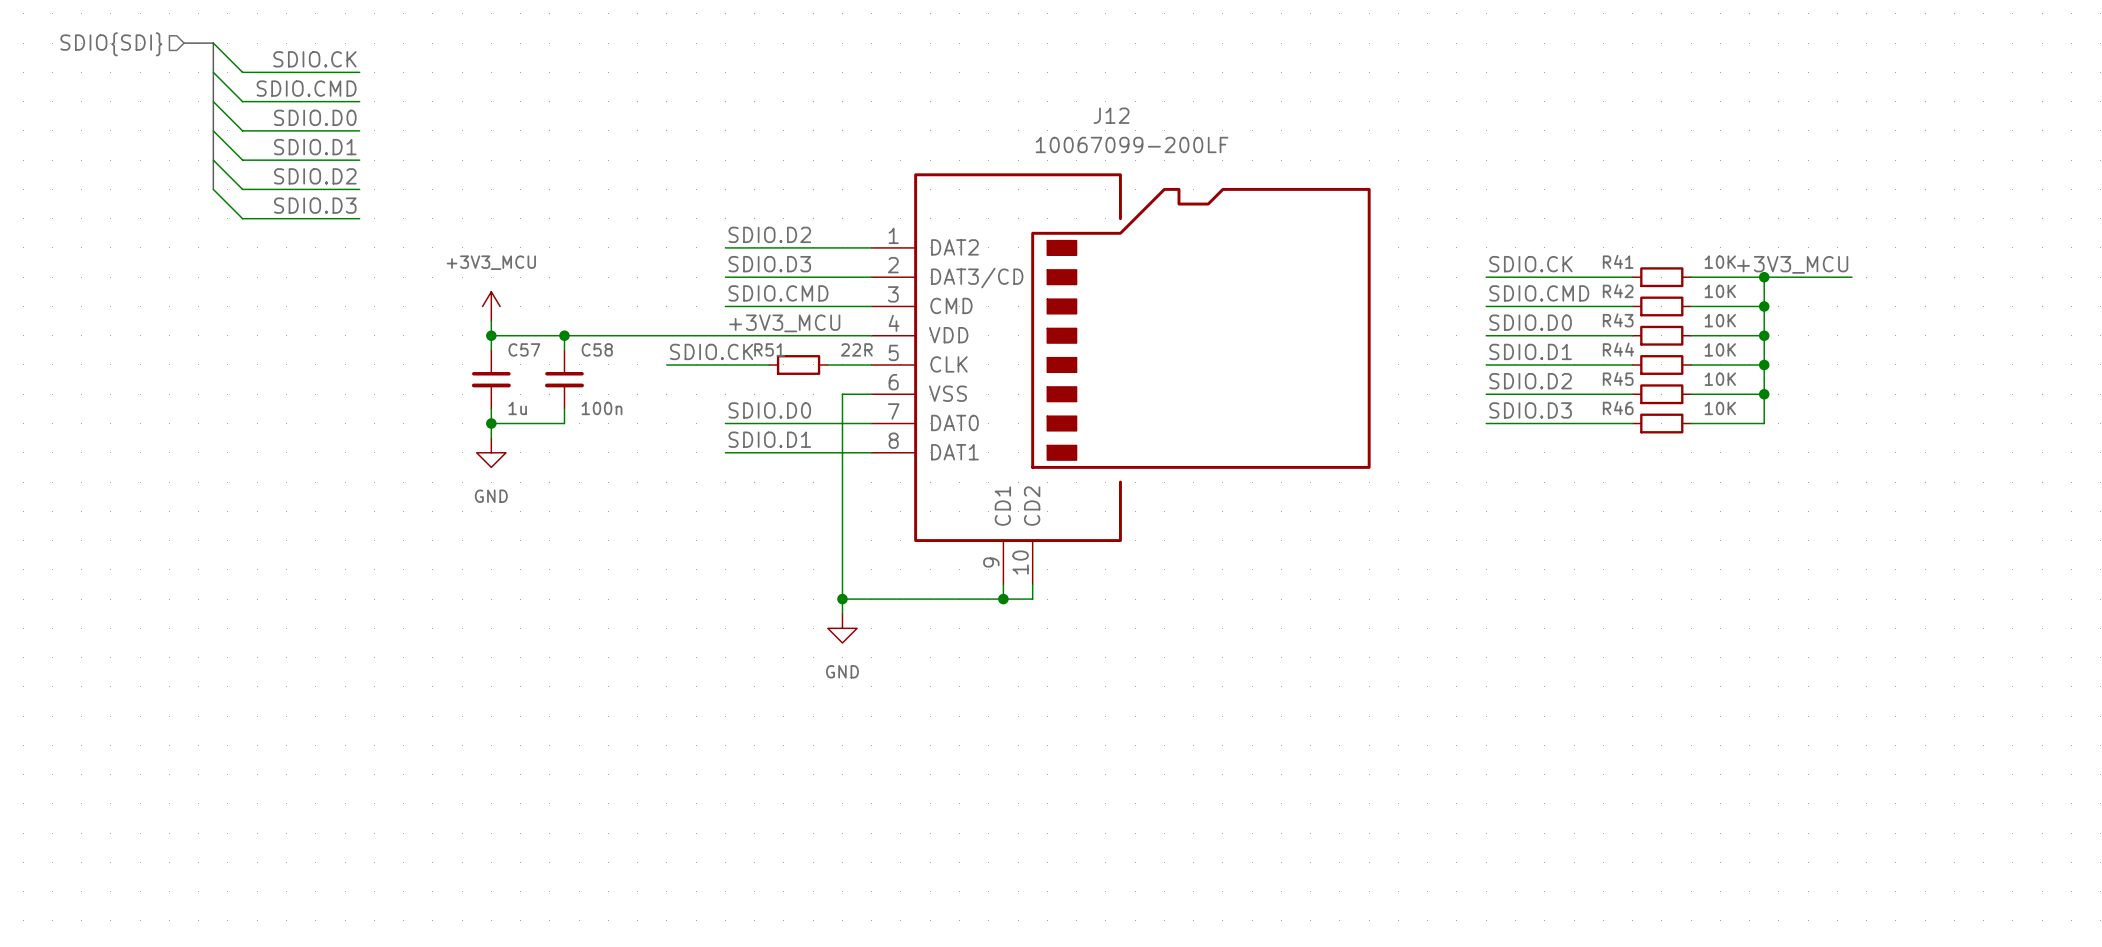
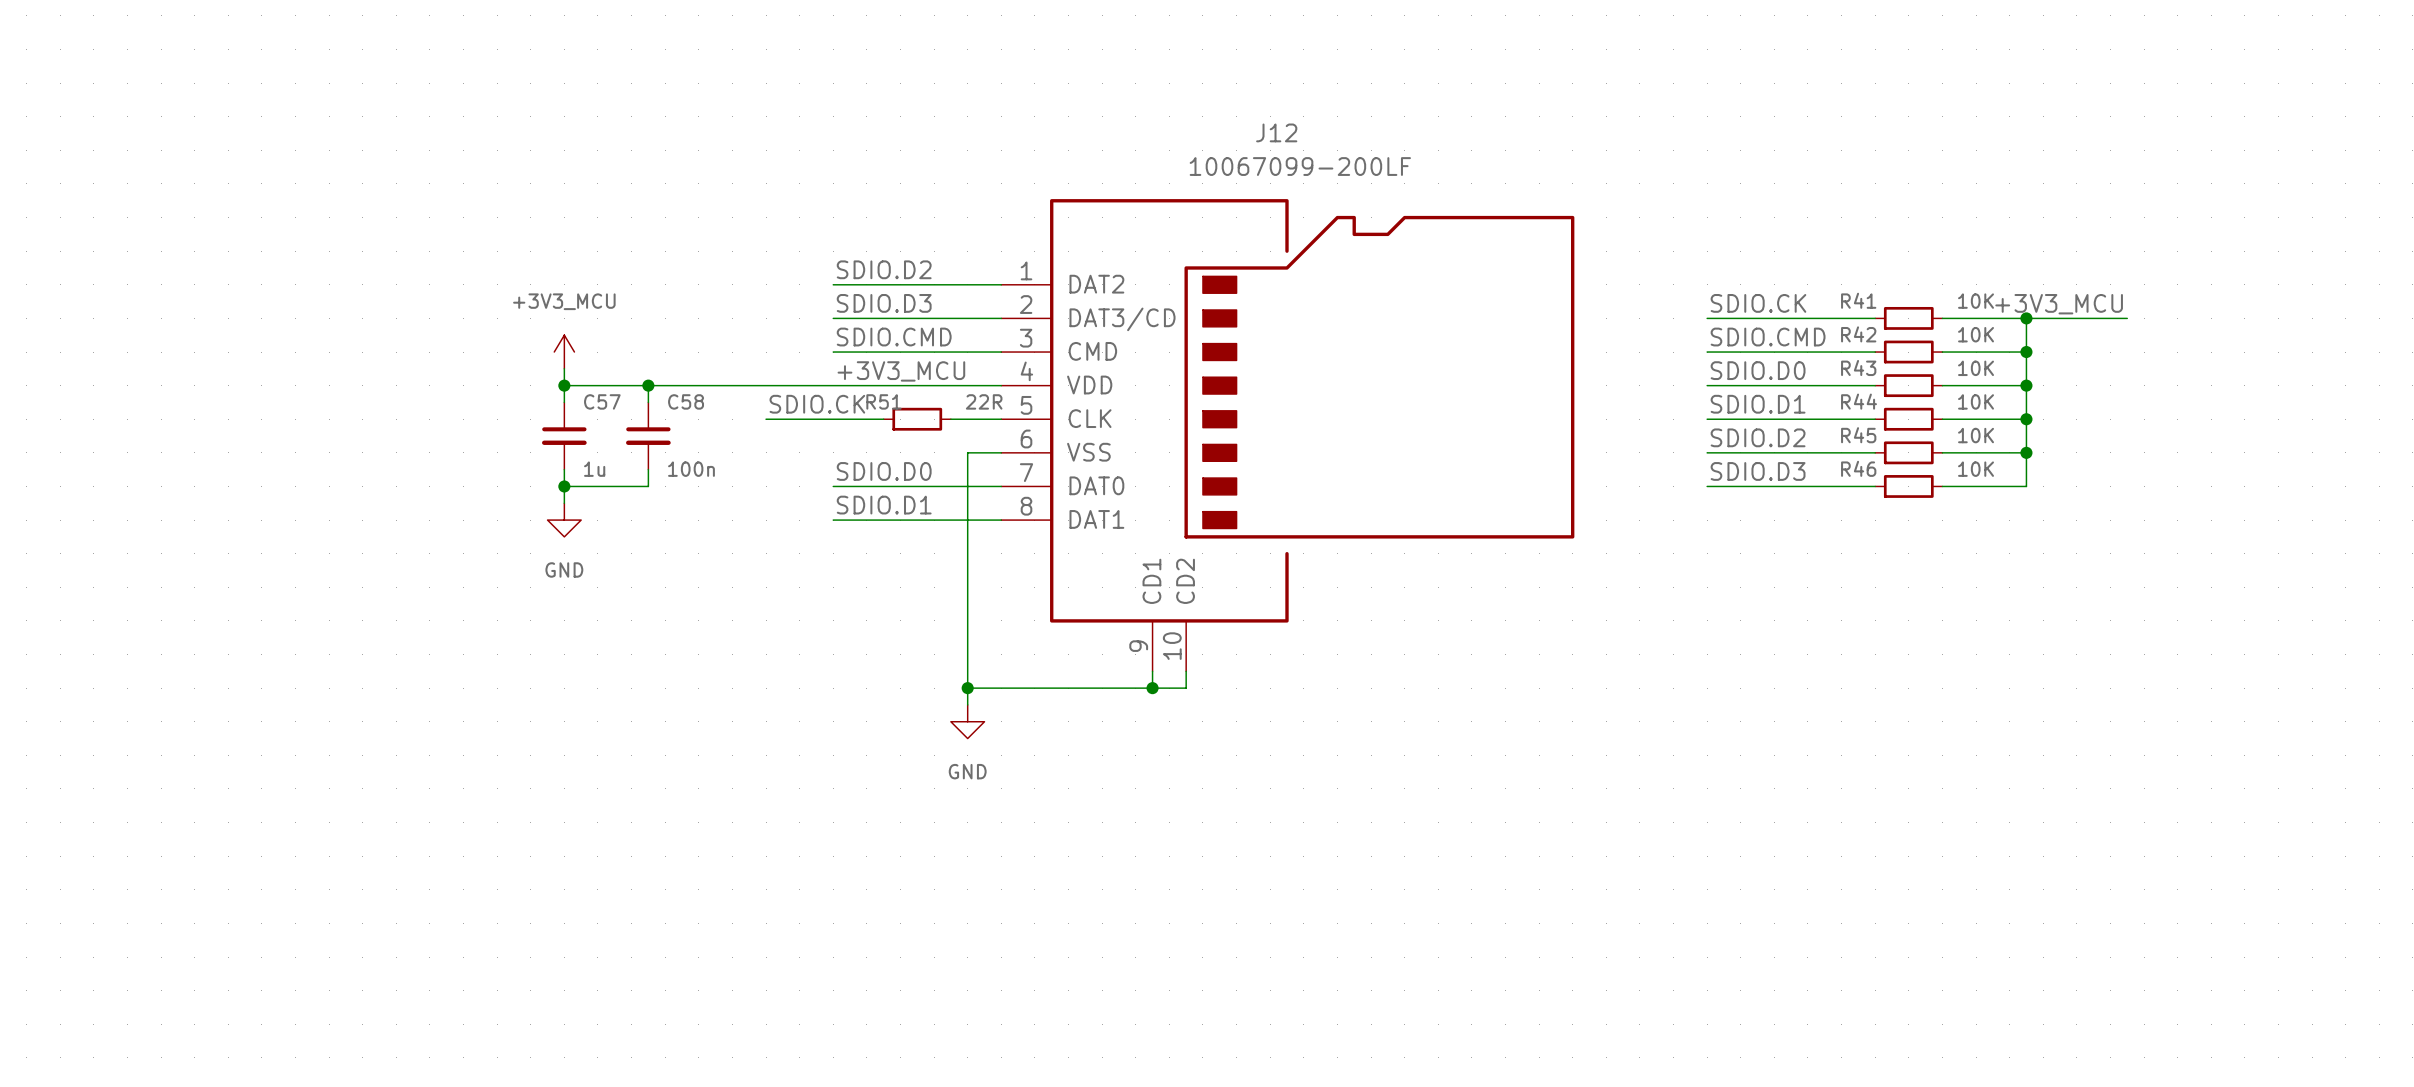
bus: (184, 43) (213, 43) (213, 189) -> none
wire: (213, 43) (242, 72) (359, 72) -> none
hierarchical label: SDIO{SDI} (111, 44) -> none
label: SDIO.CK (314, 59) -> none
wire: (213, 72) (242, 101) (359, 101) -> none
label: SDIO.CMD (306, 88) -> none
wire: (213, 101) (242, 130) (359, 130) -> none
label: SDIO.D0 (315, 117) -> none
wire: (213, 130) (242, 160) (359, 160) -> none
label: SDIO.D1 (315, 147) -> none
wire: (213, 160) (242, 189) (359, 189) -> none
label: SDIO.D2 (315, 176) -> none
wire: (213, 189) (242, 218) (359, 218) -> none
label: SDIO.D3 (315, 205) -> none

